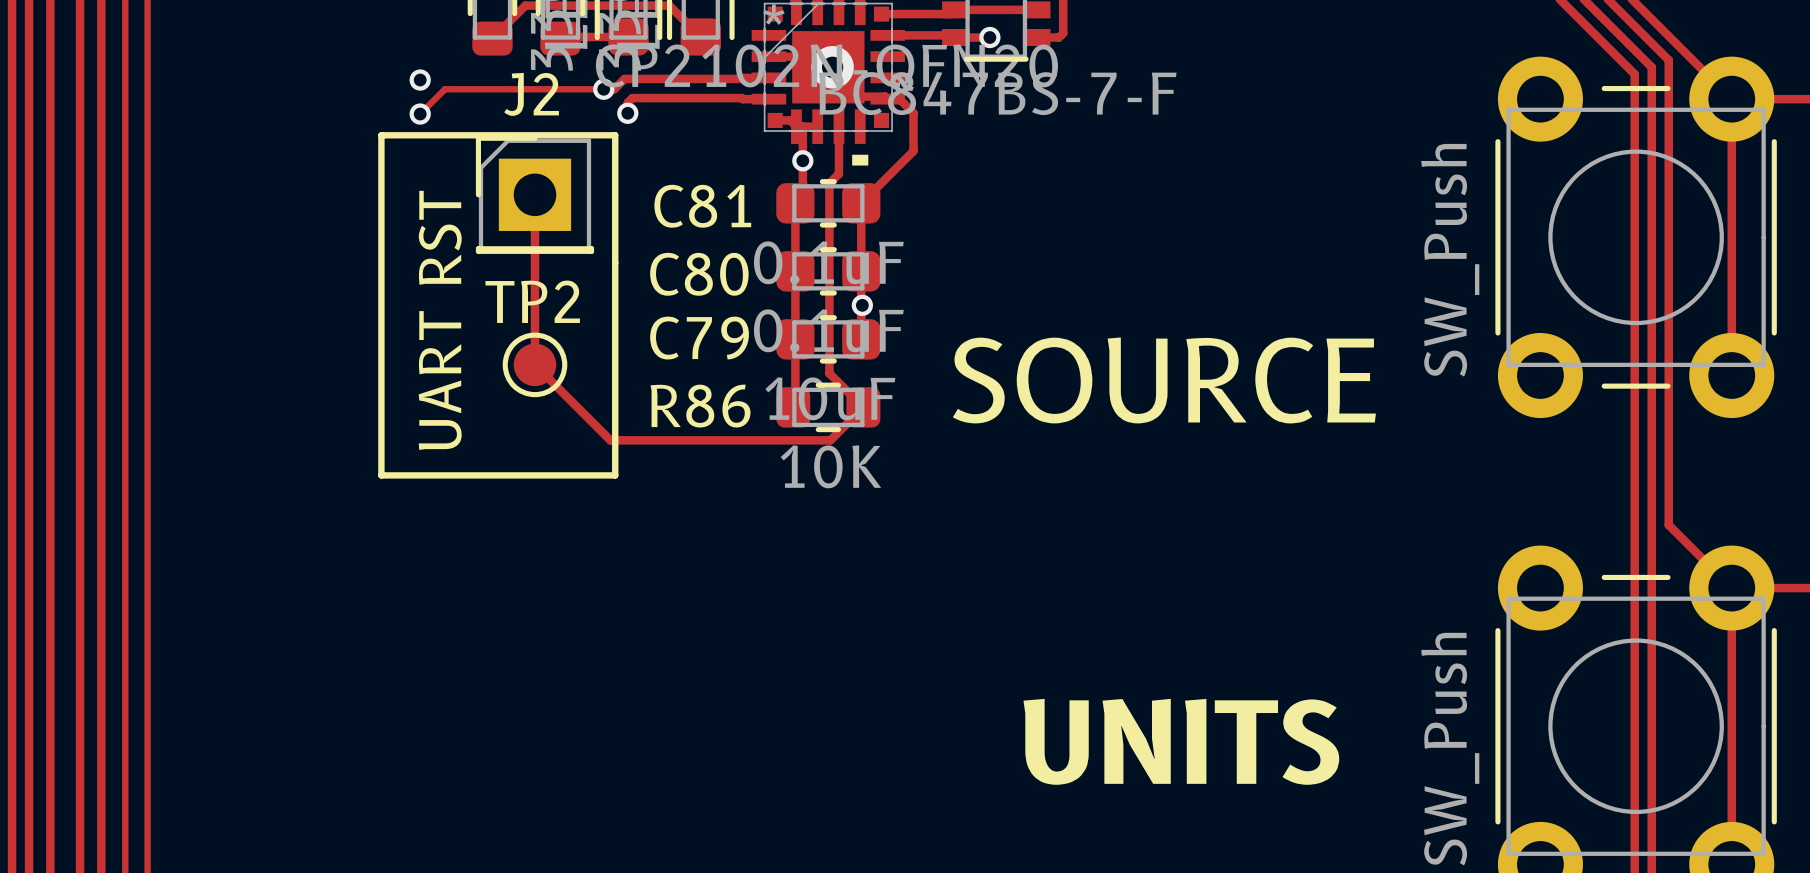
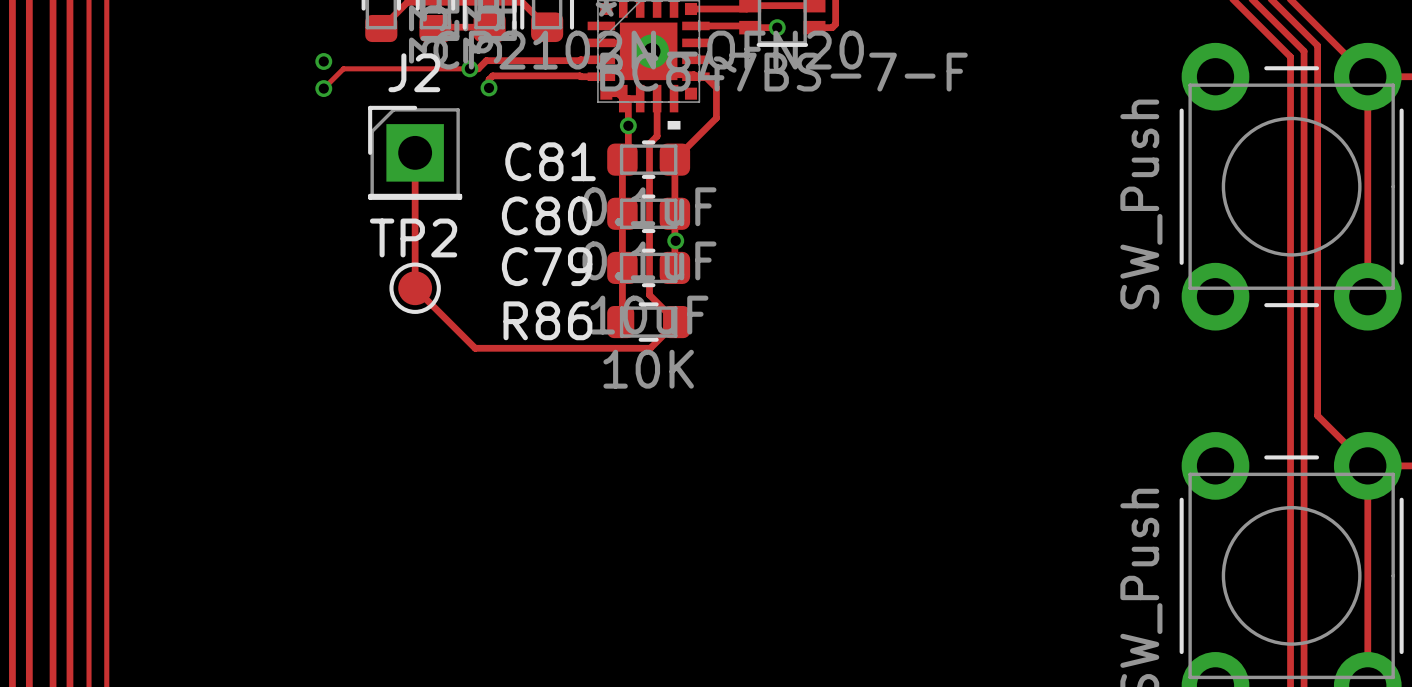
line: (381, 135) (615, 135) (615, 475) (381, 475) (381, 135) -> none
text: UART RST (440, 320) -> none
text: SOURCE (1164, 380) -> none
text: UNITS (1181, 741) -> none

